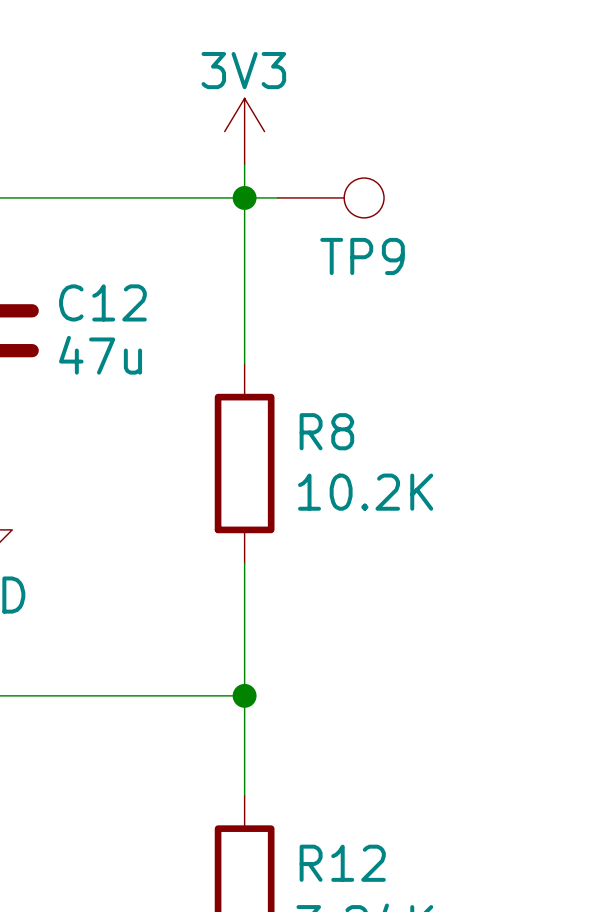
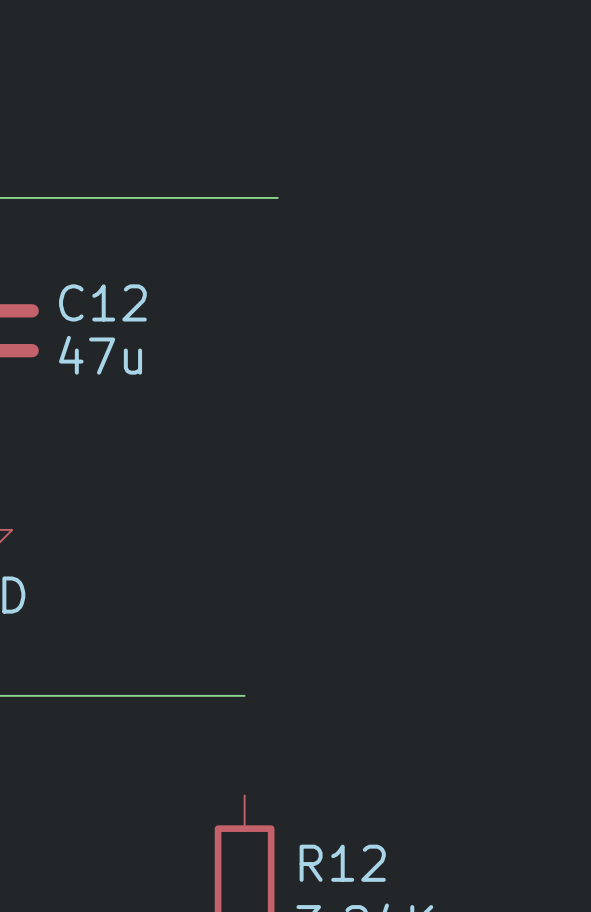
power symbol: 3V3 (244, 131) -> none
wire: (244, 164) (244, 363) -> none
junction: (244, 197) -> none
TP9: (330, 197) -> none
R8: 10.2K (244, 463) -> none
wire: (244, 563) (244, 795) -> none
junction: (244, 695) -> none

